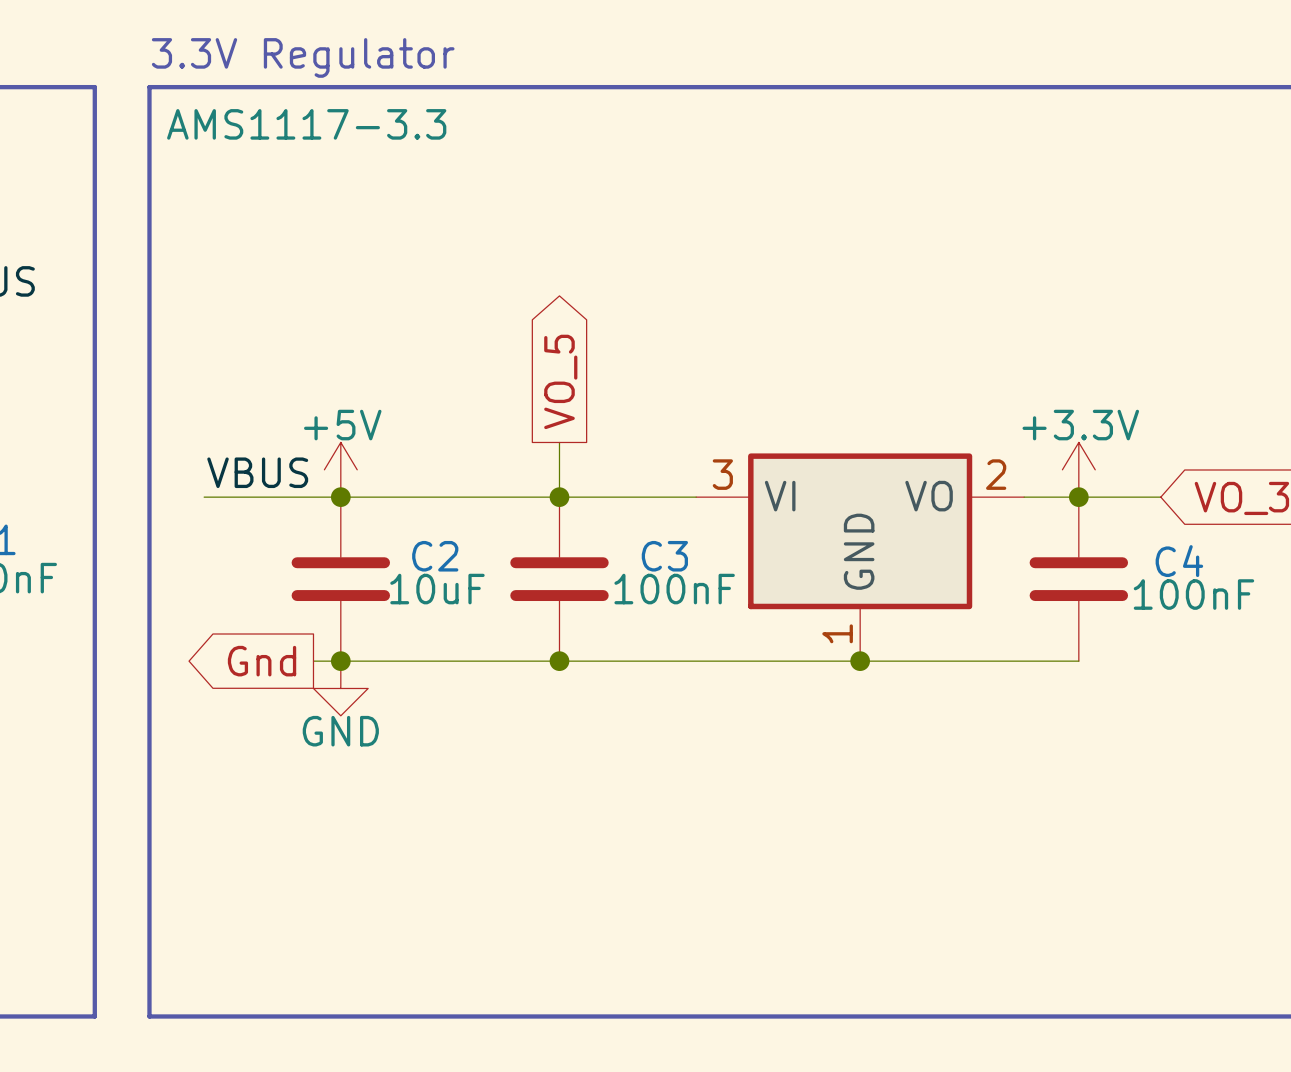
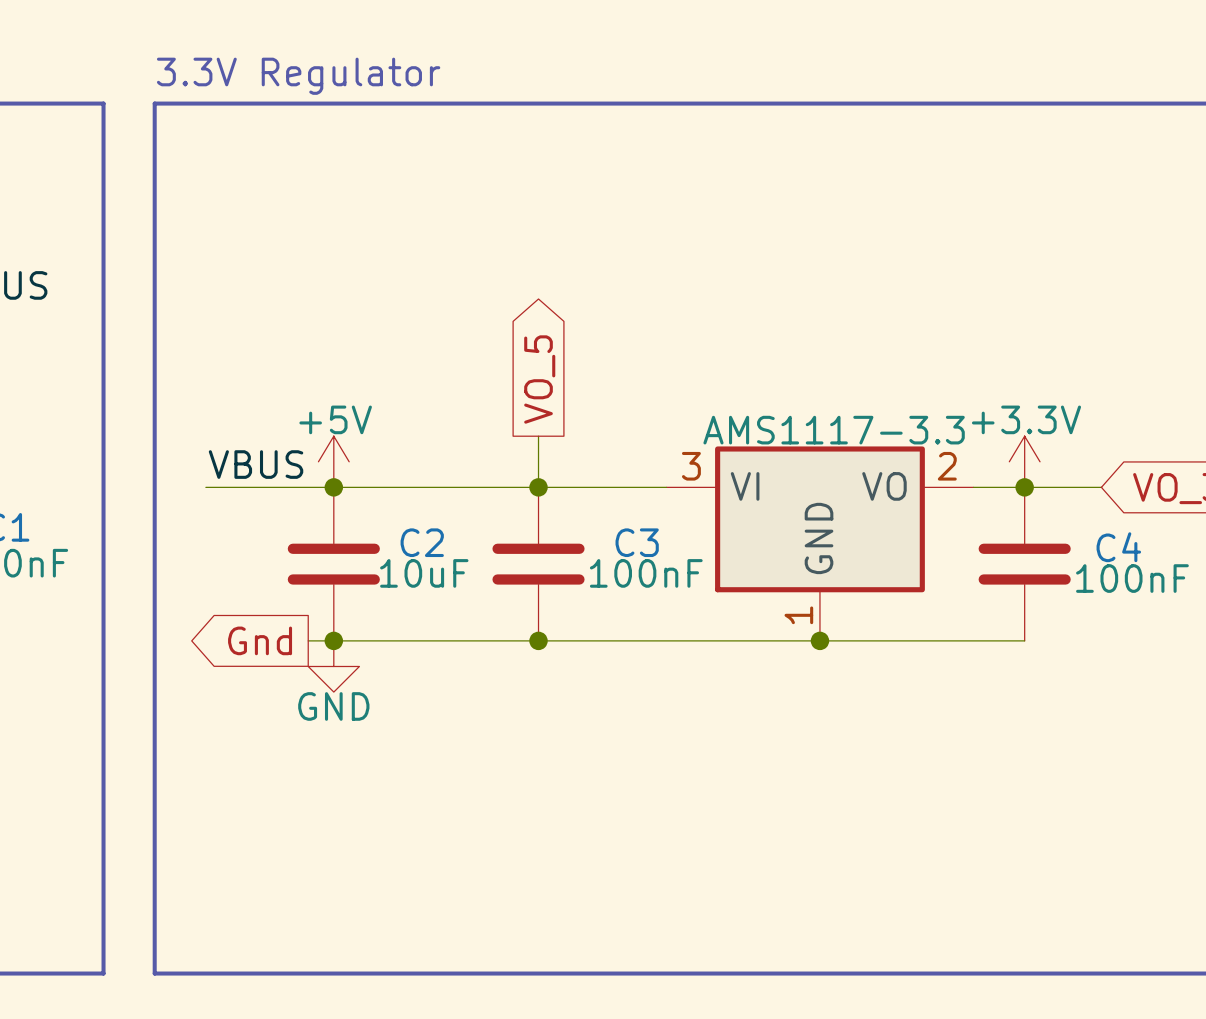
part value position: AMS1117-3.3 (306, 124) -> AMS1117-3.3 (834, 430)

